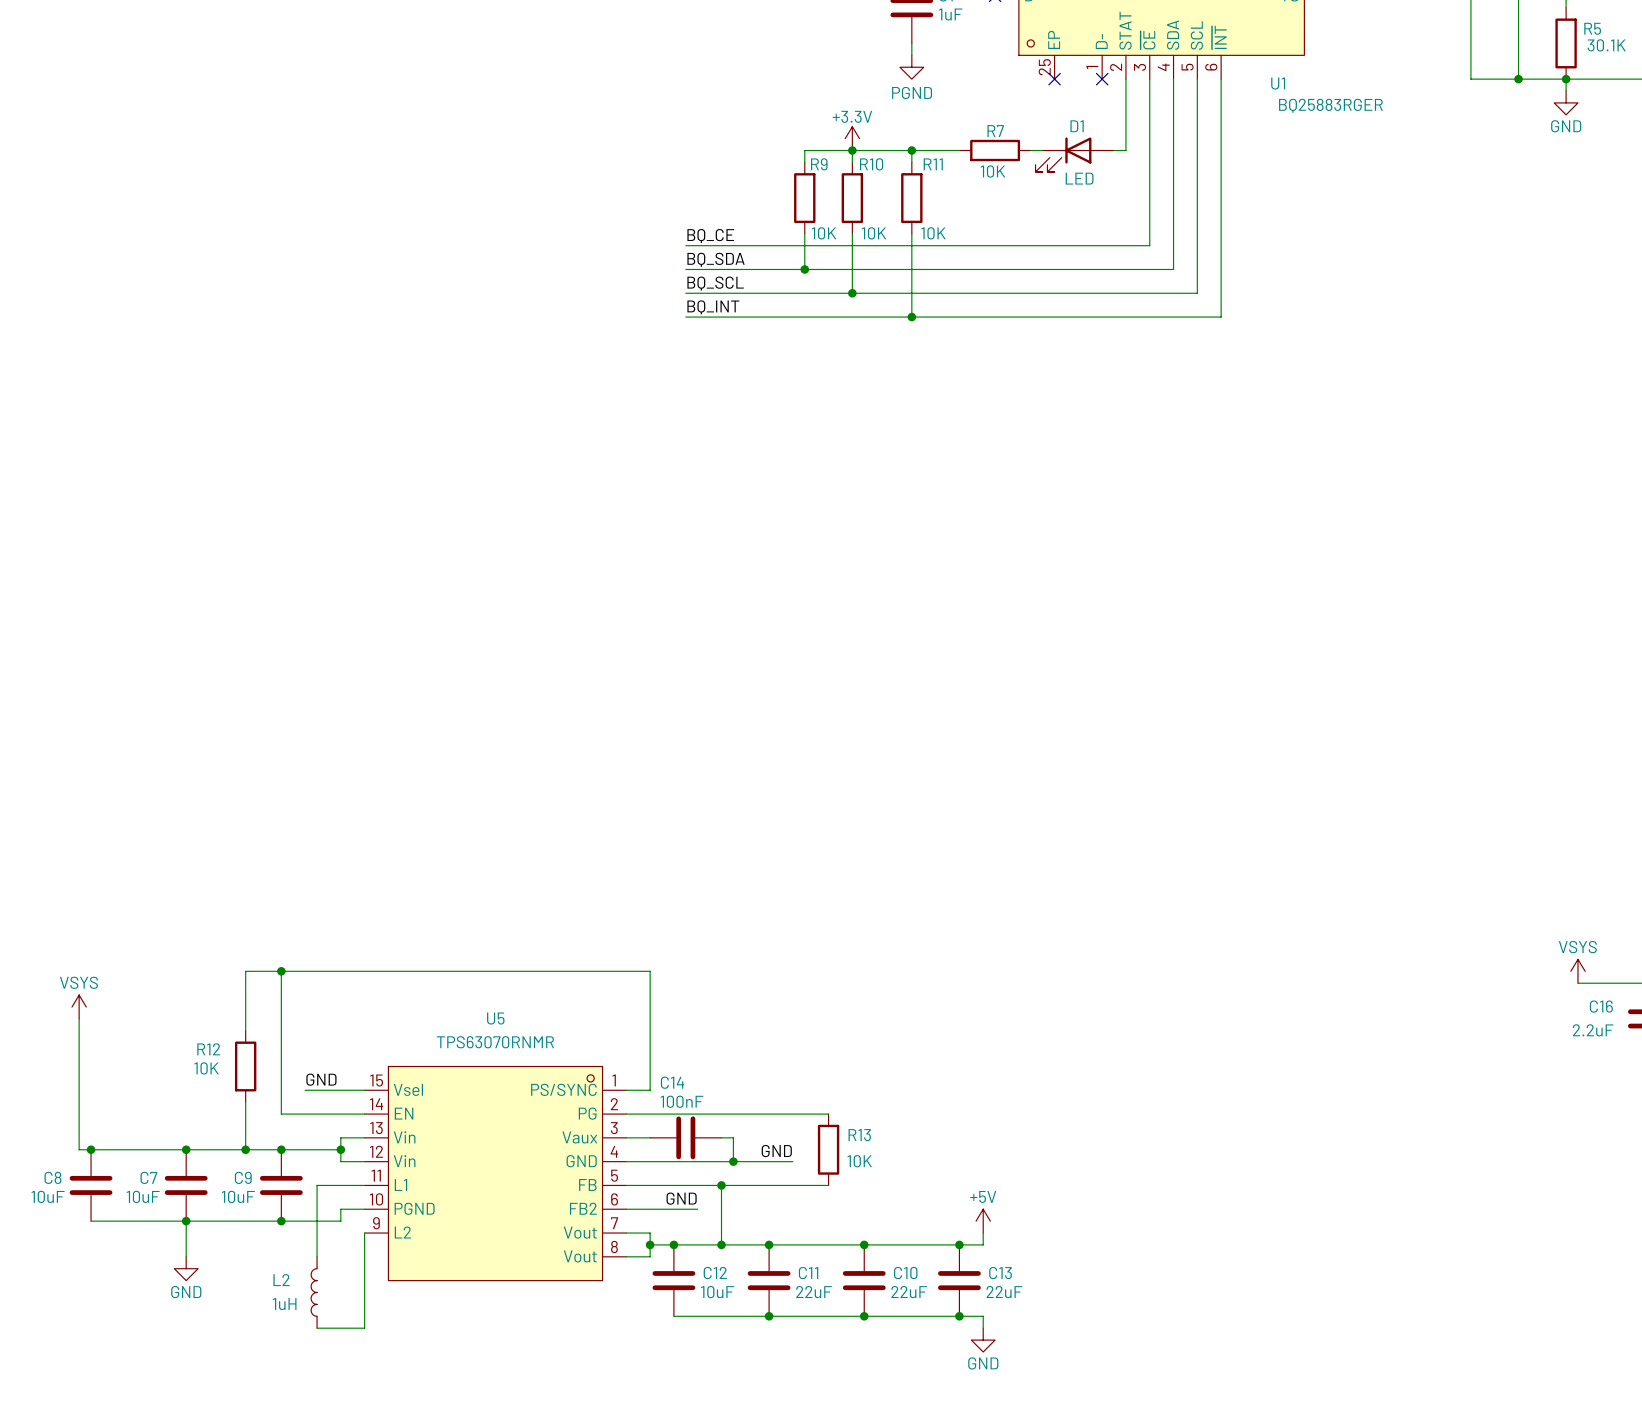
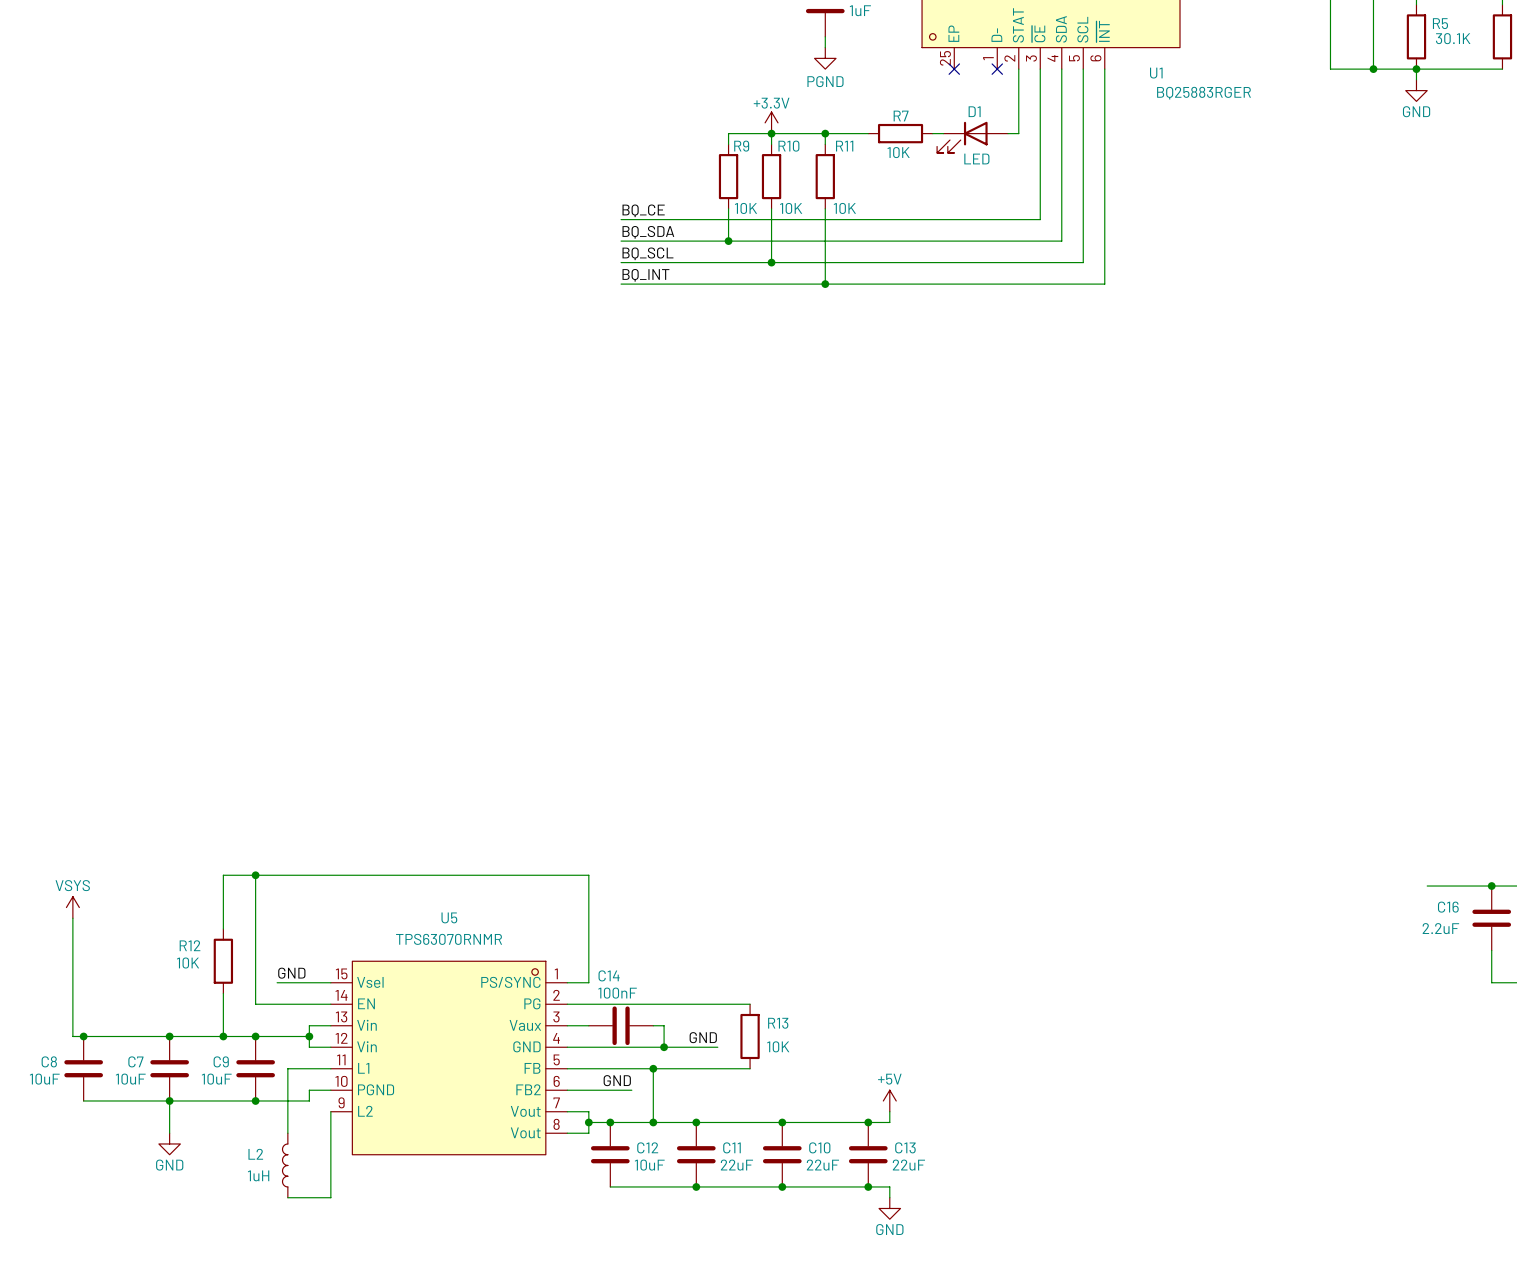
power symbol: VSYS (1577, 971) -> none

